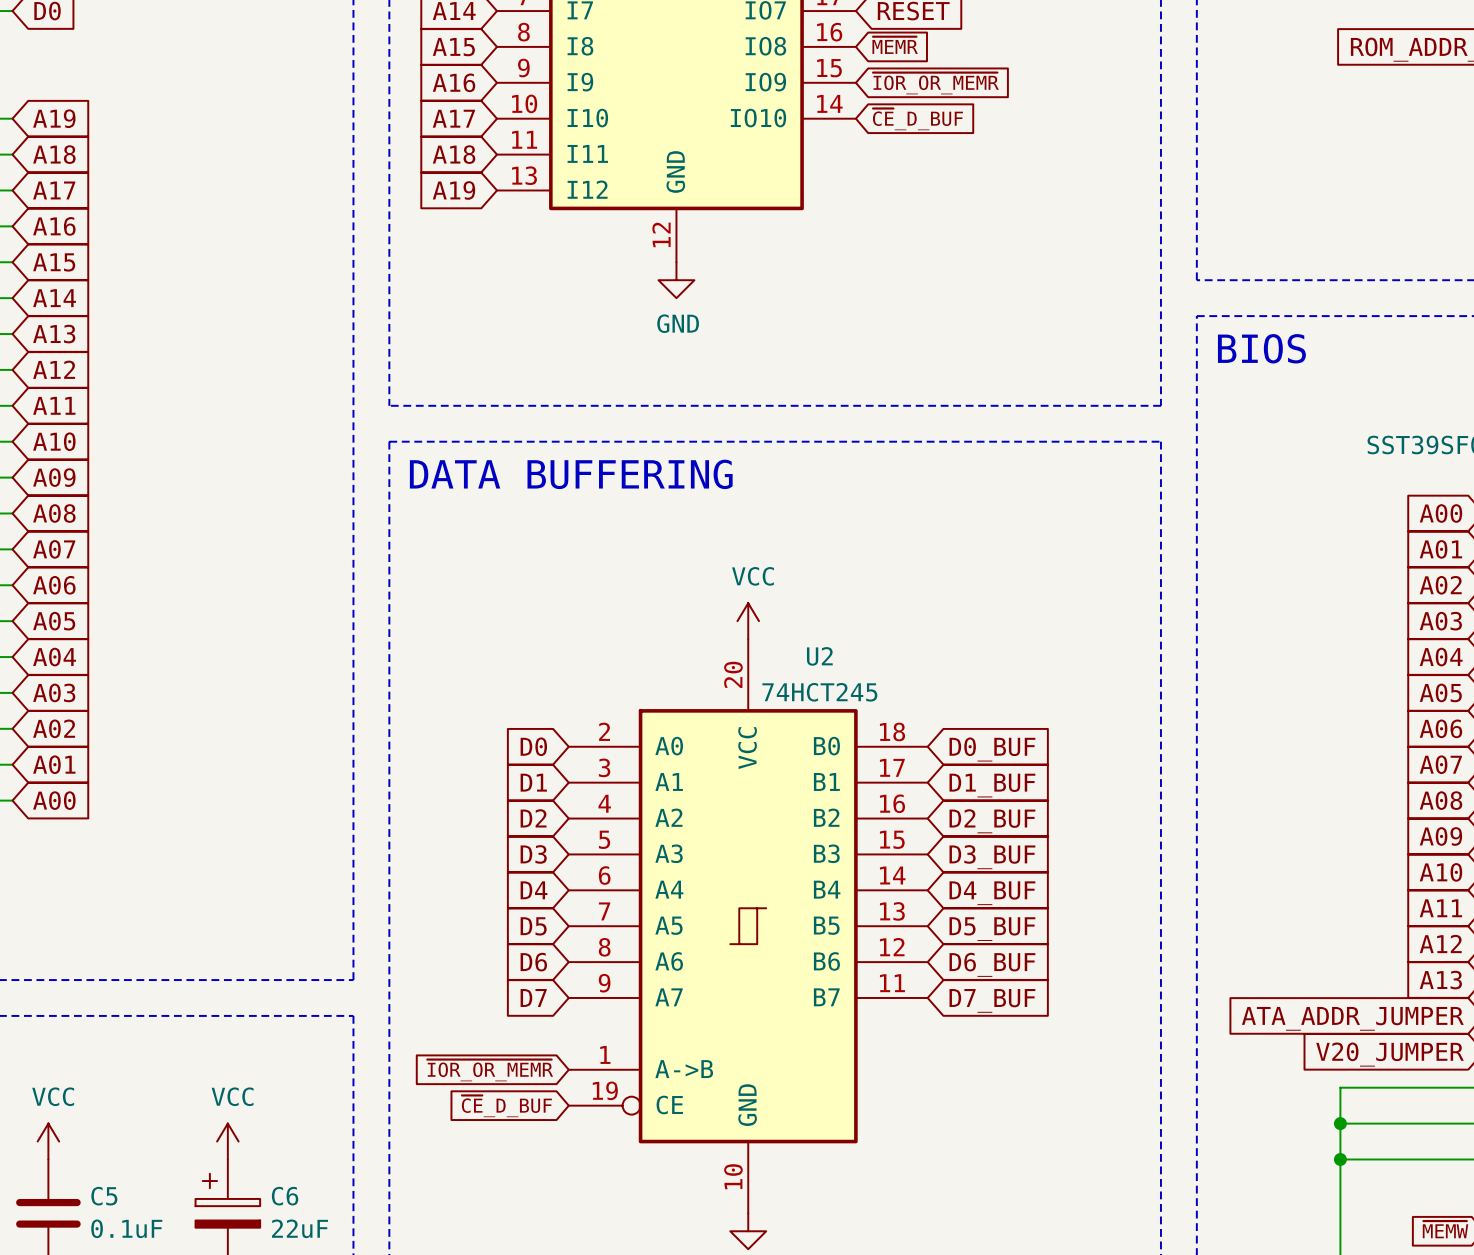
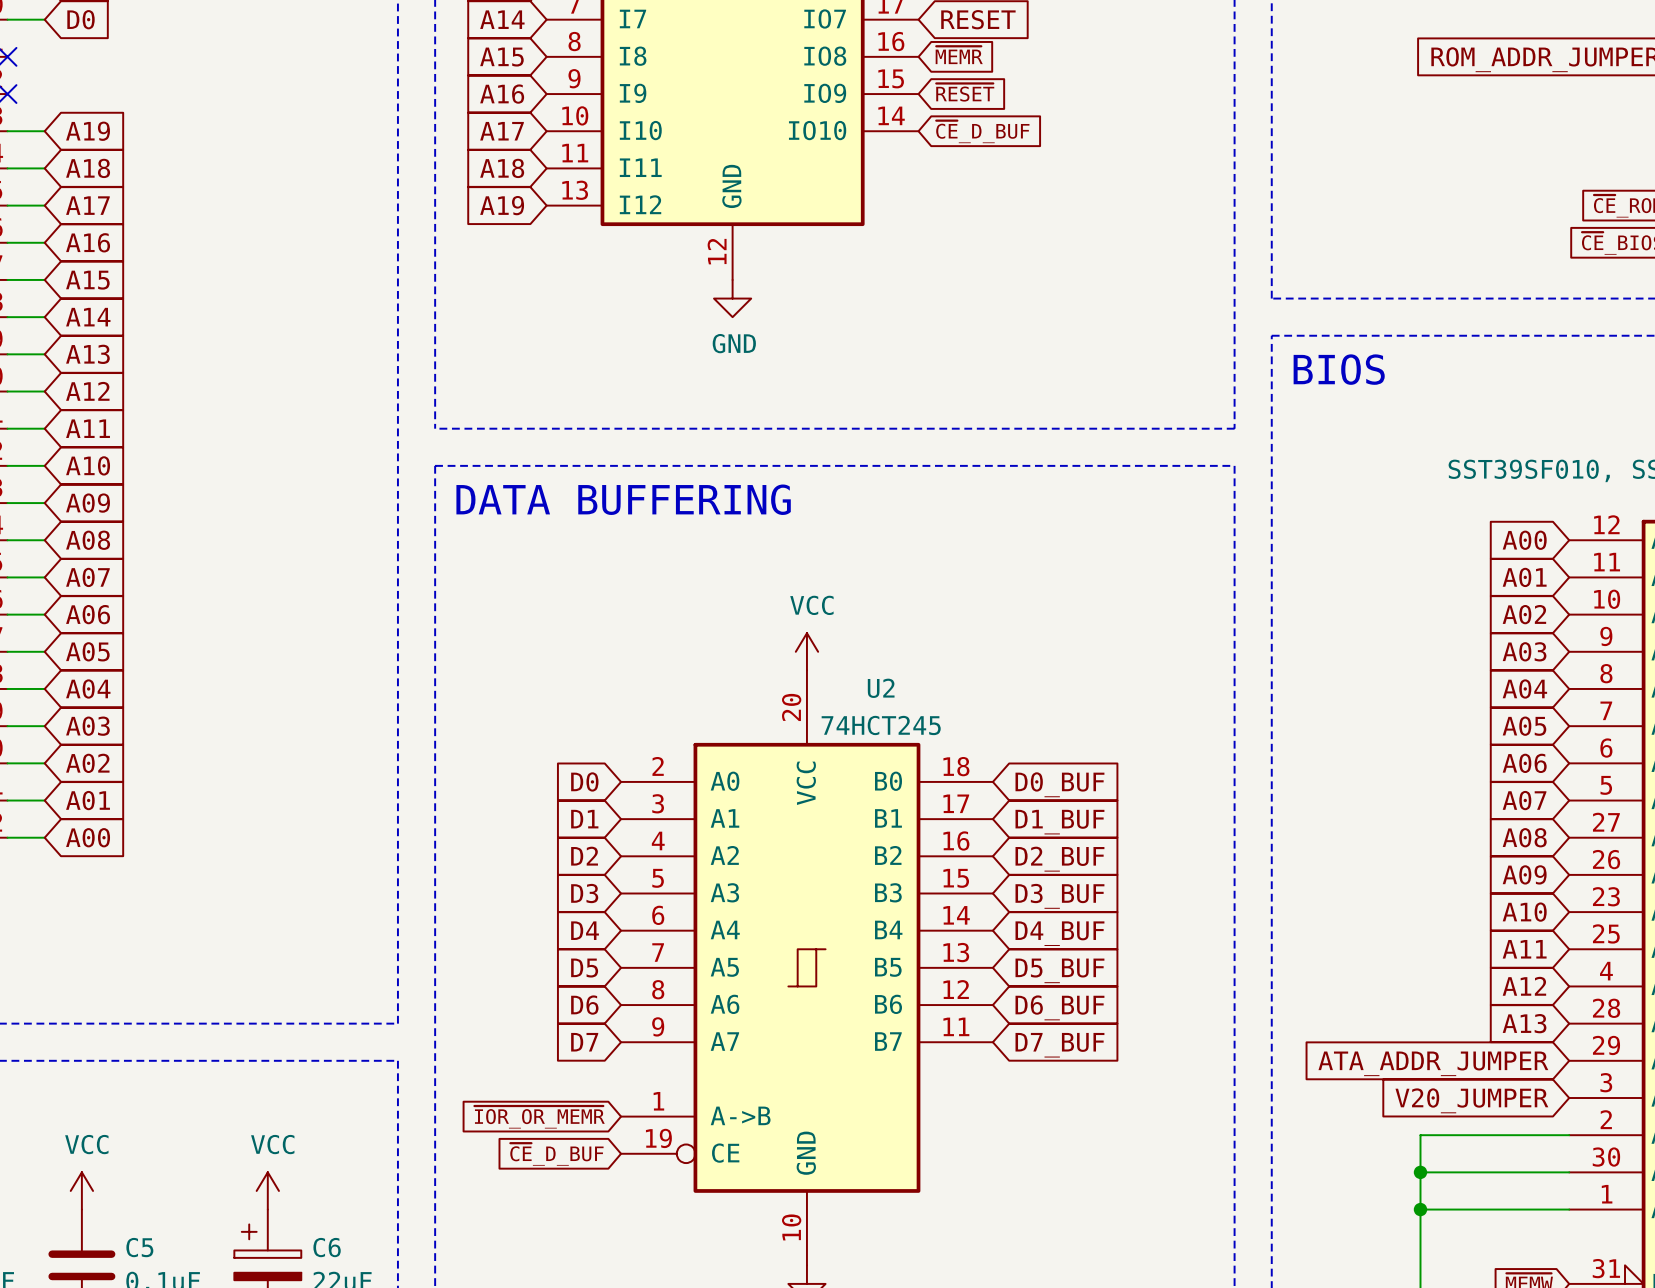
global label: ~{IOR_OR_MEMR} (935, 83) -> ~{RESET} (965, 92)

